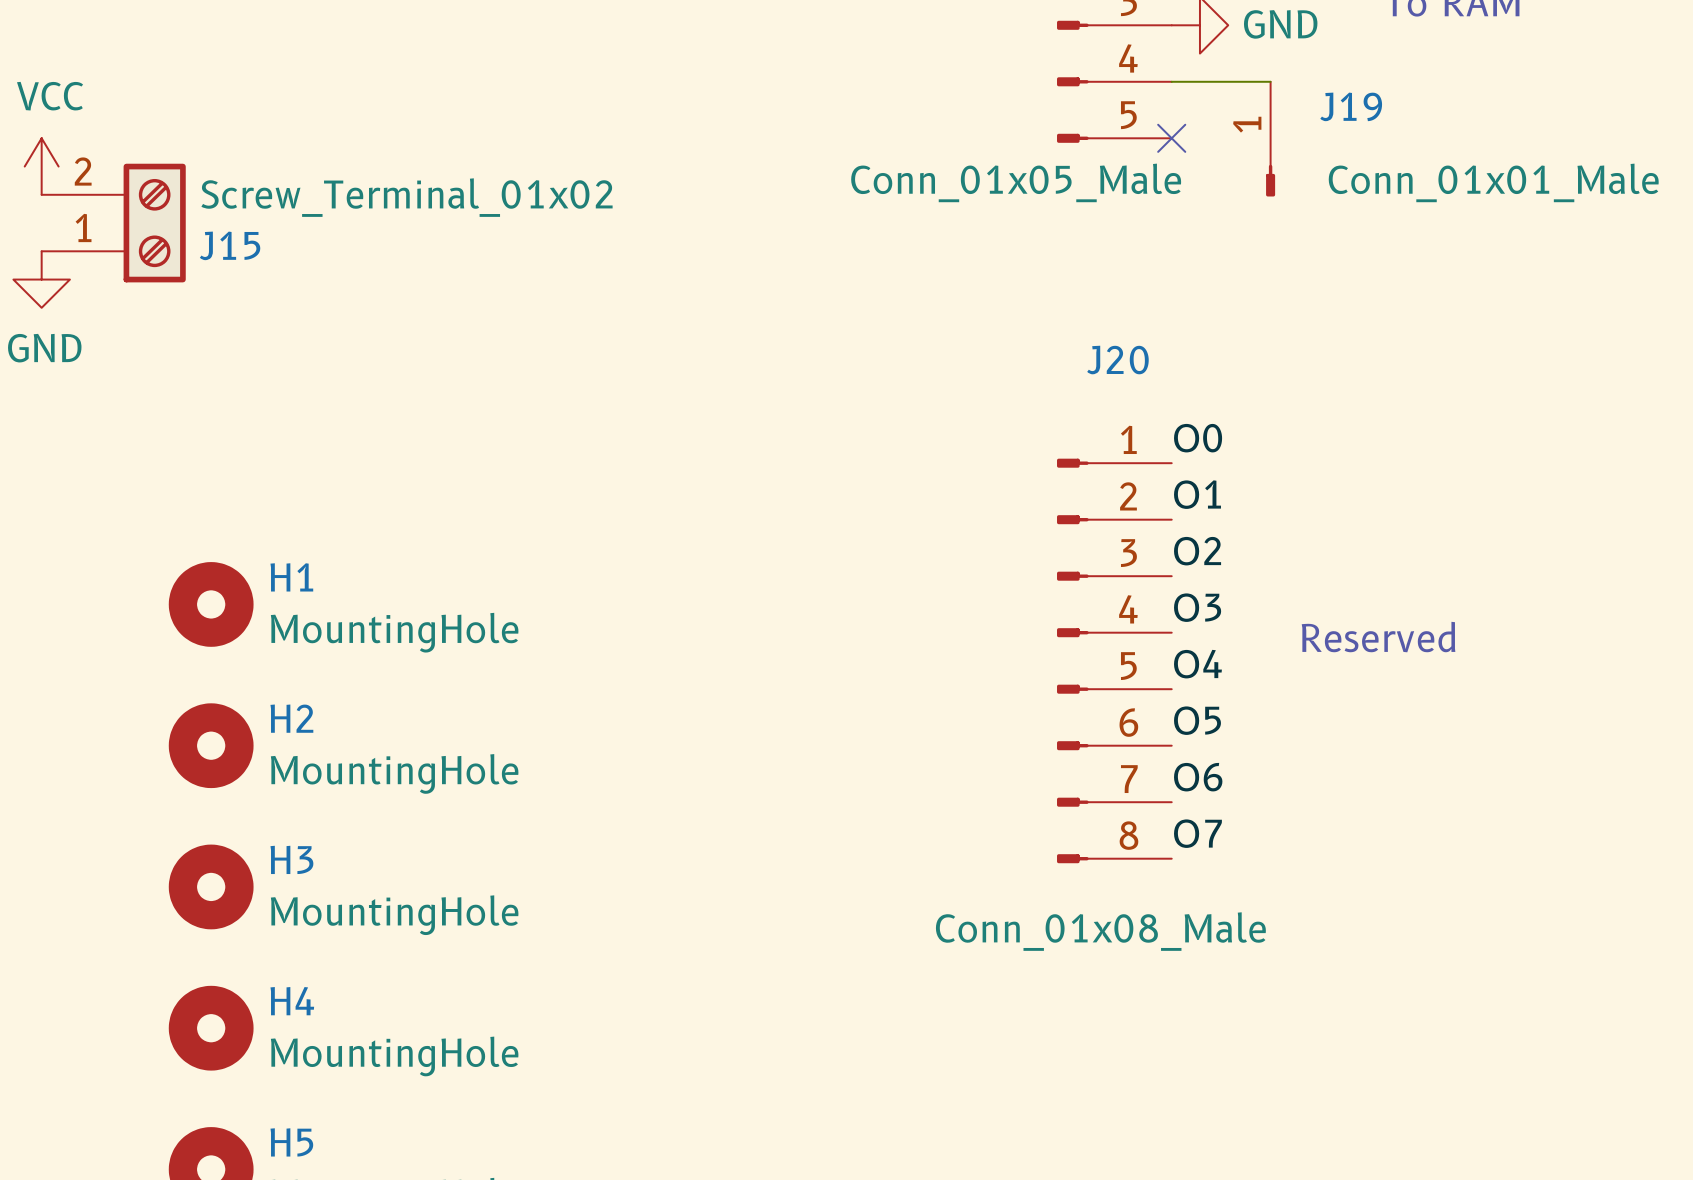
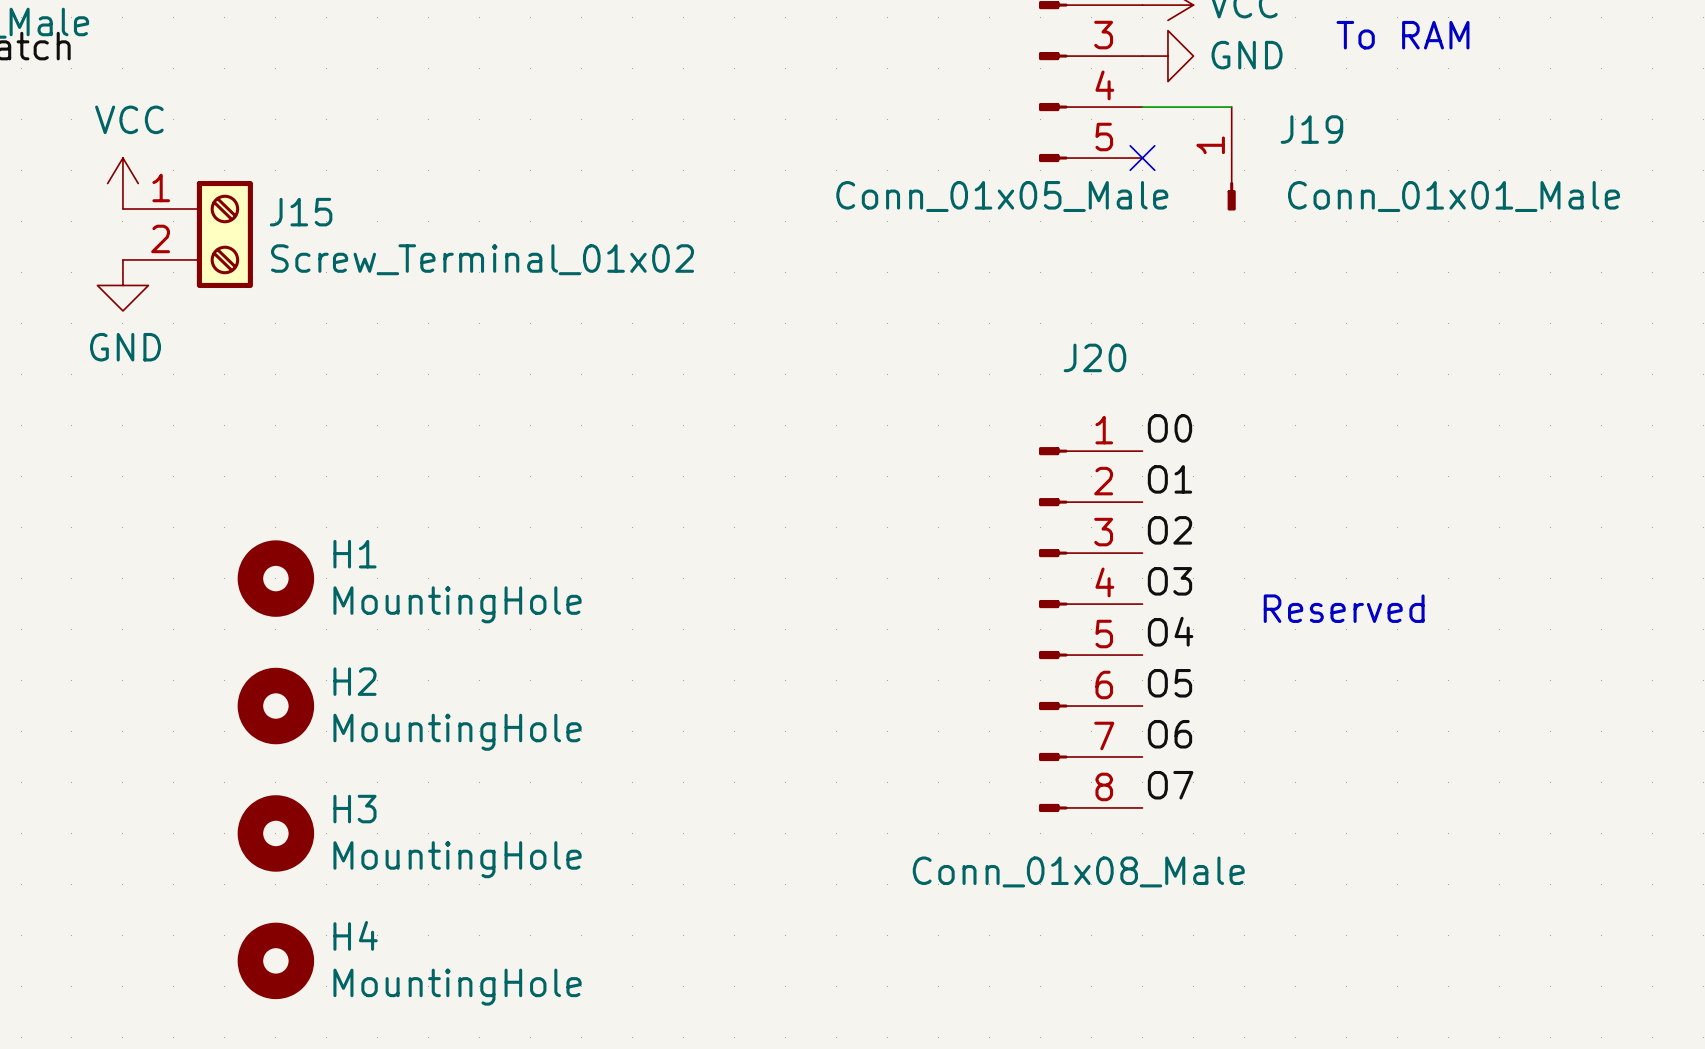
J15 flip: as is (154, 223) -> up-down (224, 234)

